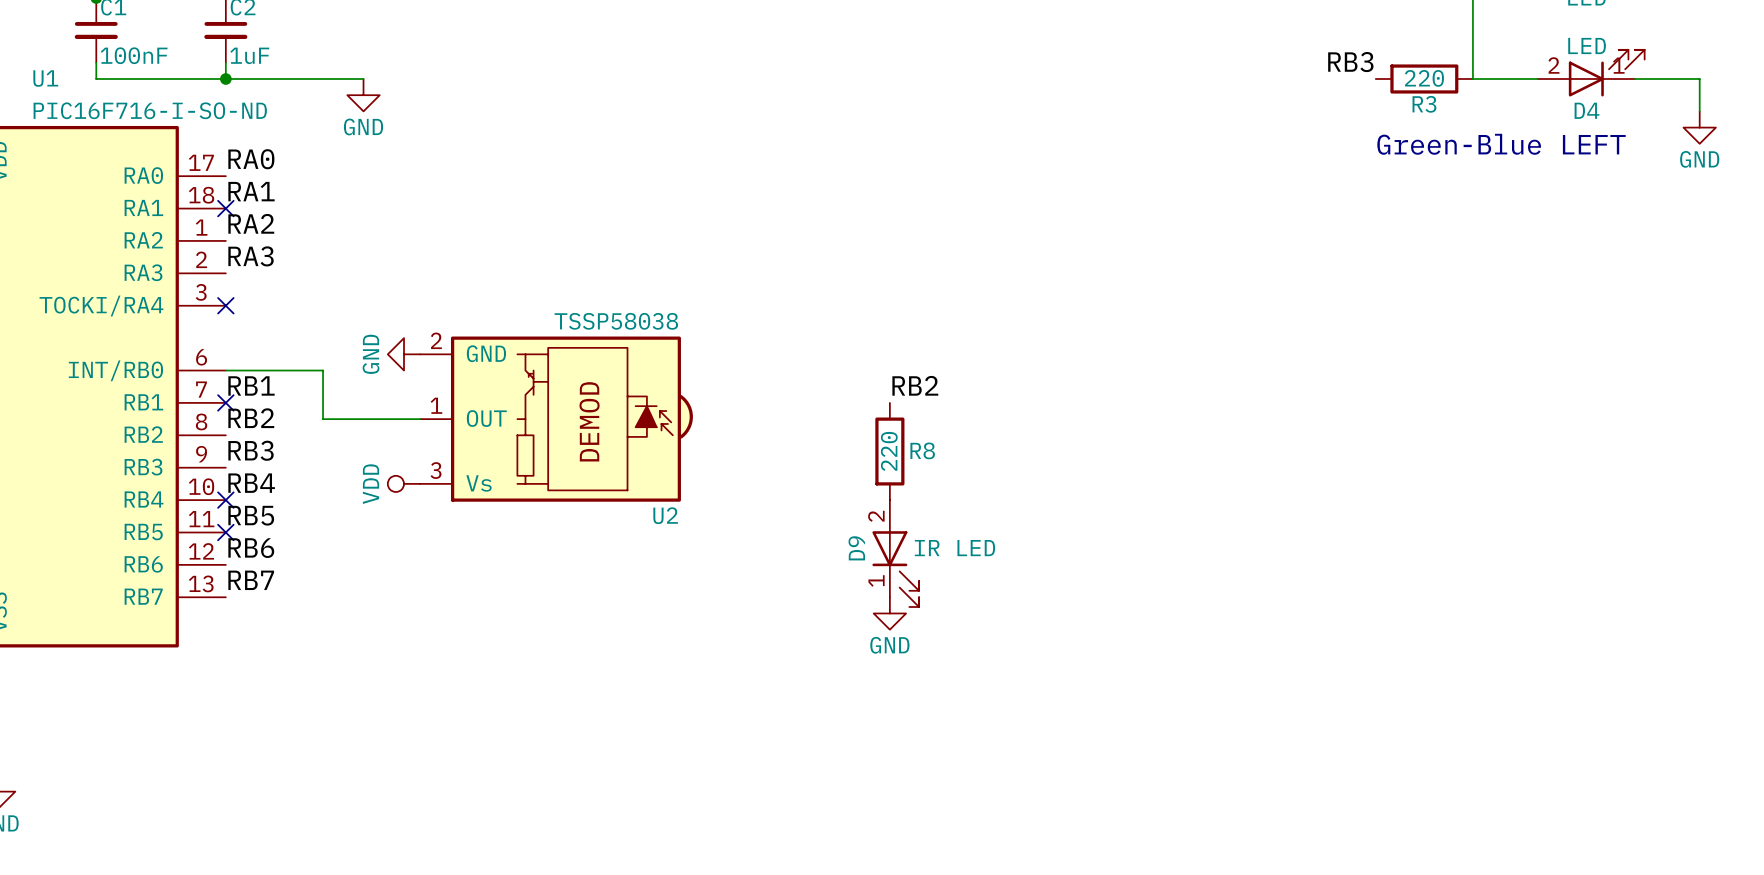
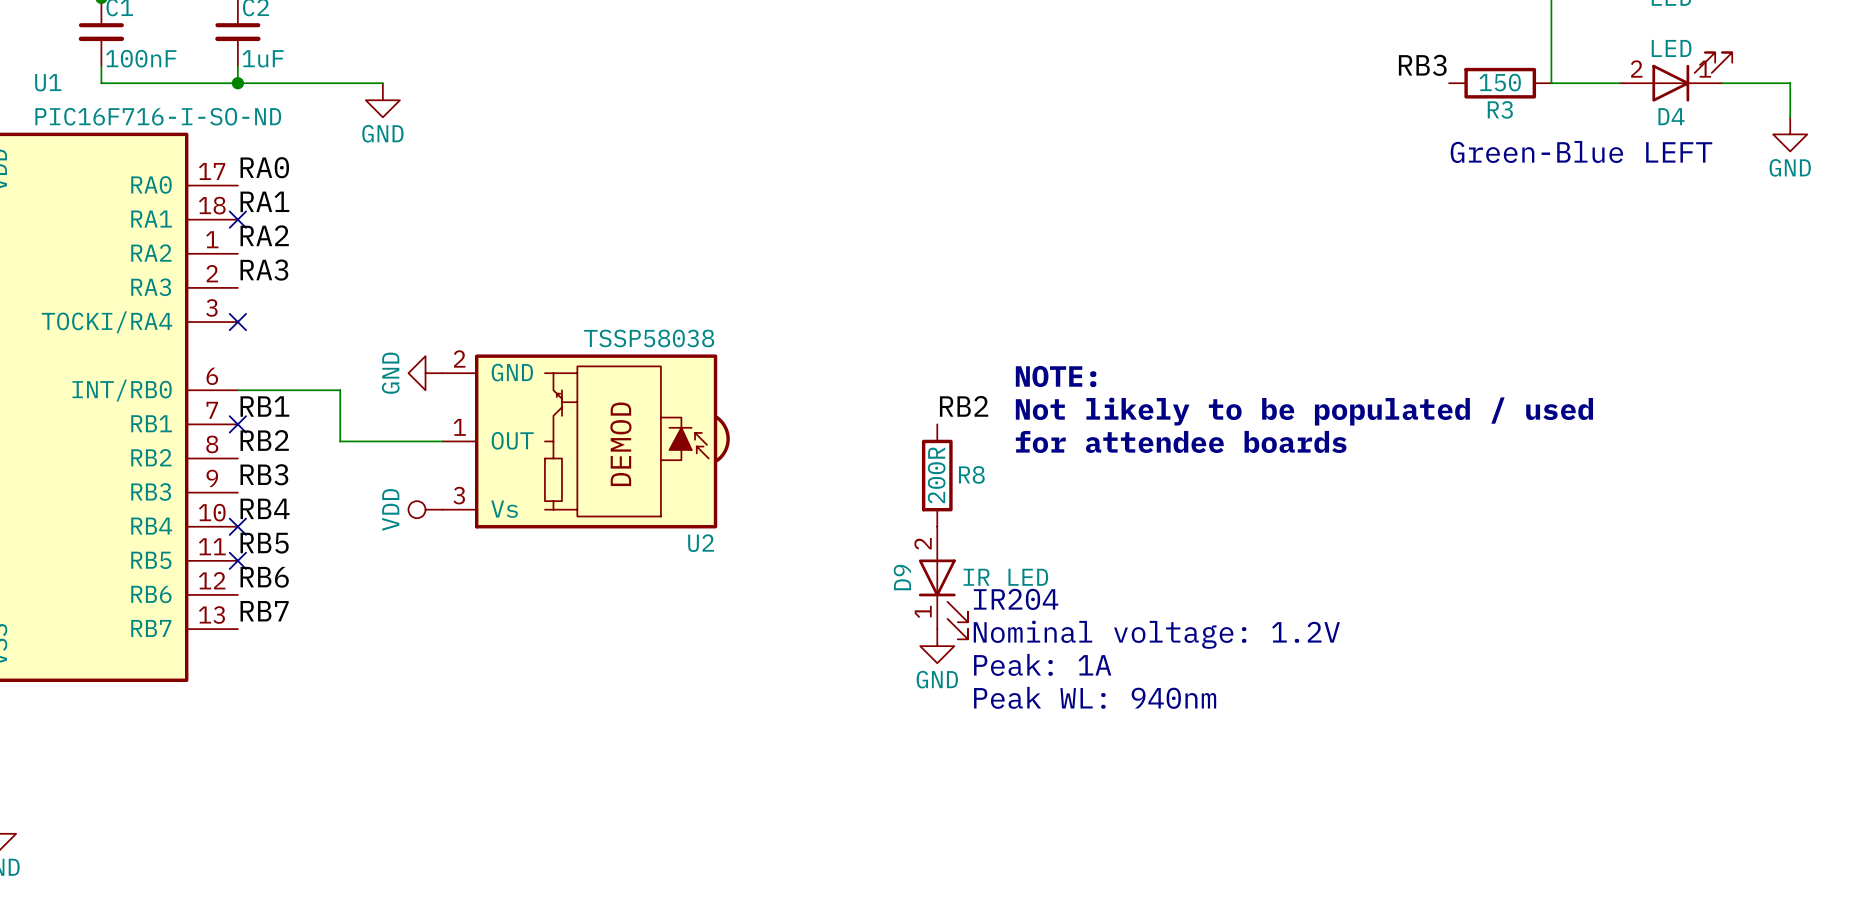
R3 value: 220 (1424, 78) -> 150 (1500, 82)
text: none -> NOTE: (1056, 376)
text: none -> Not likely to be populated / used (1304, 411)
text: none -> for attendee boards (1181, 441)
R8 value: 220 (889, 451) -> 200R (936, 475)
text: none -> IR204 (1016, 599)
text: none -> Nominal voltage: 1.2V (1156, 634)
text: none -> Peak: 1A (1042, 664)
text: none -> Peak WL: 940nm (1095, 697)

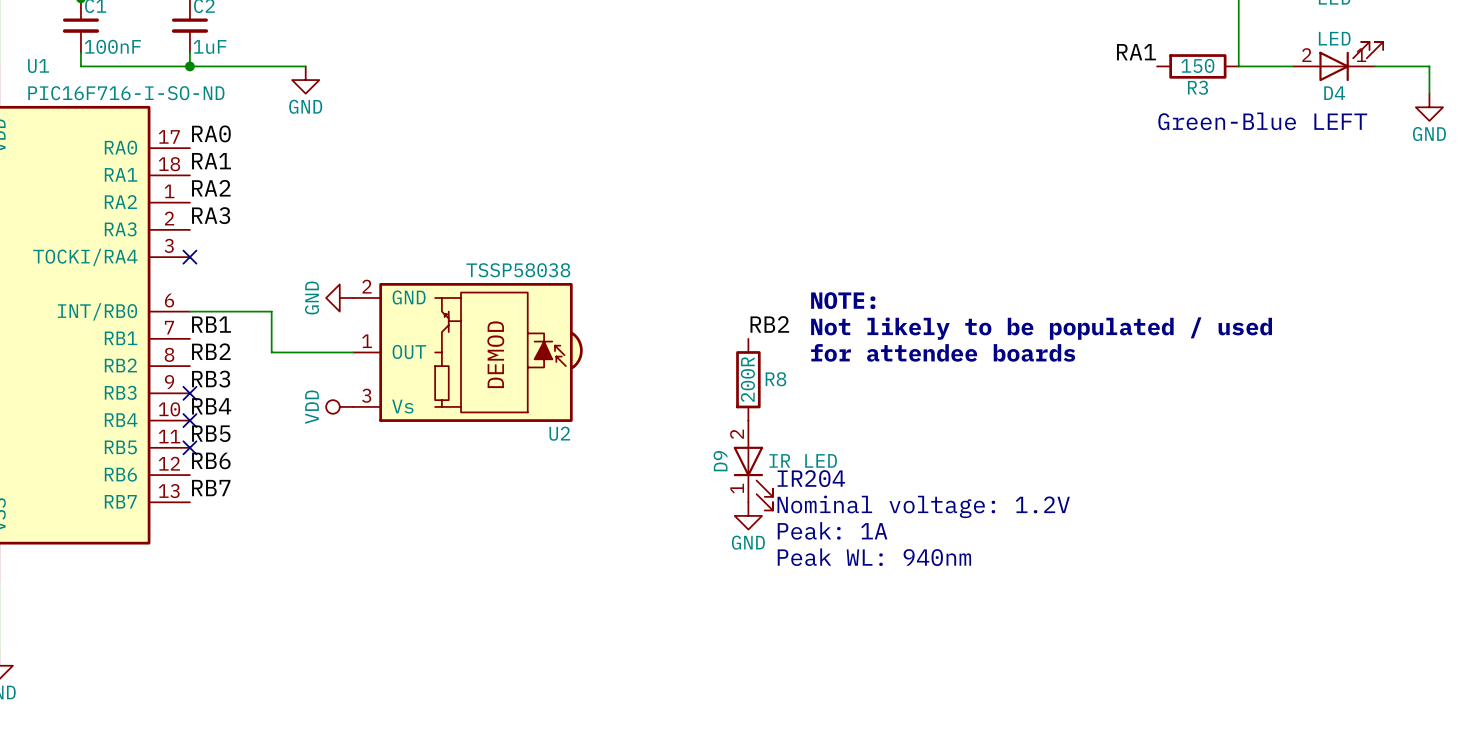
label: RB3 (1422, 65) -> RA1 (1136, 52)
no-connect mark: (237, 219) -> none
no-connect mark position: (237, 424) -> (189, 393)

